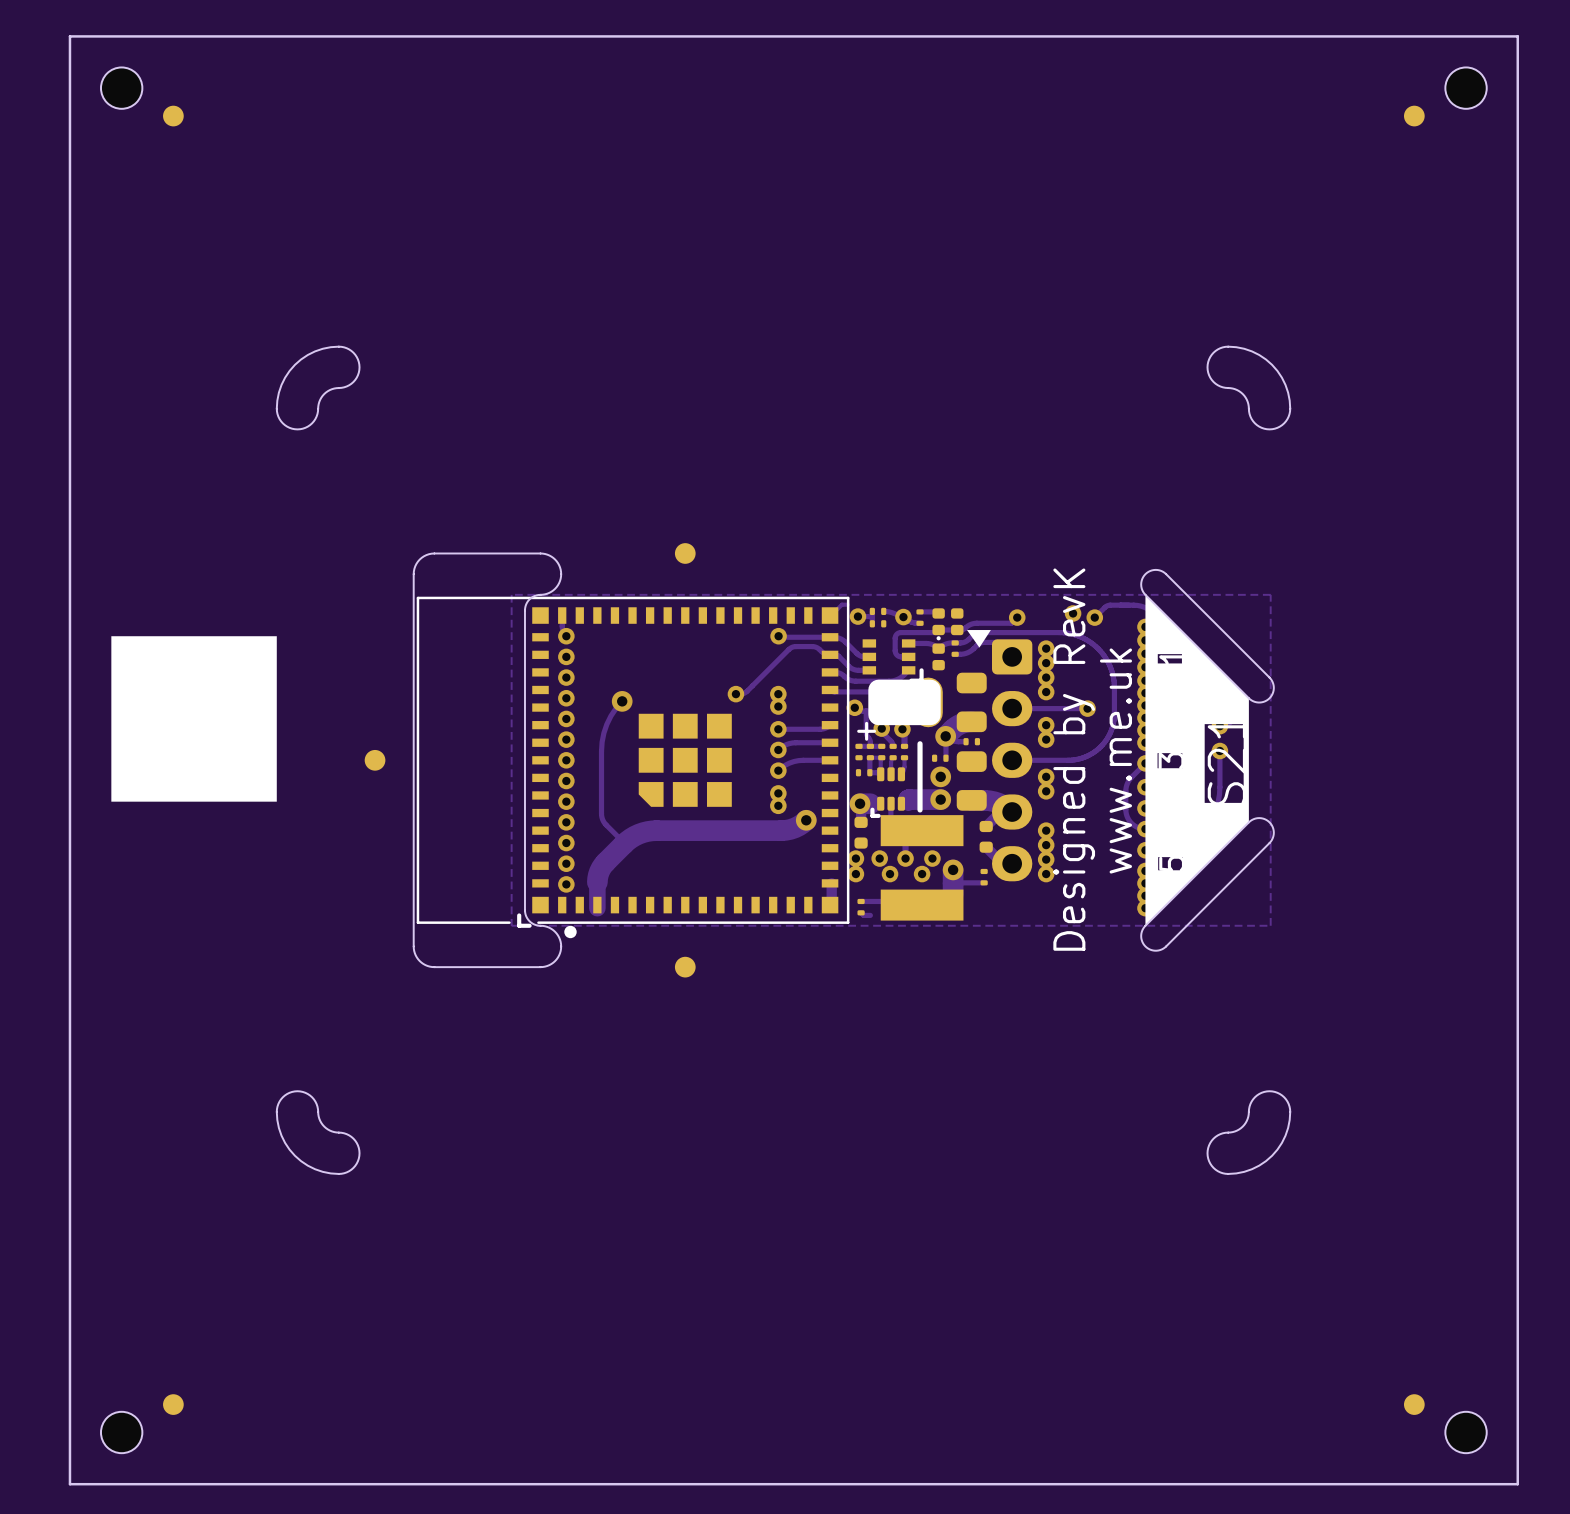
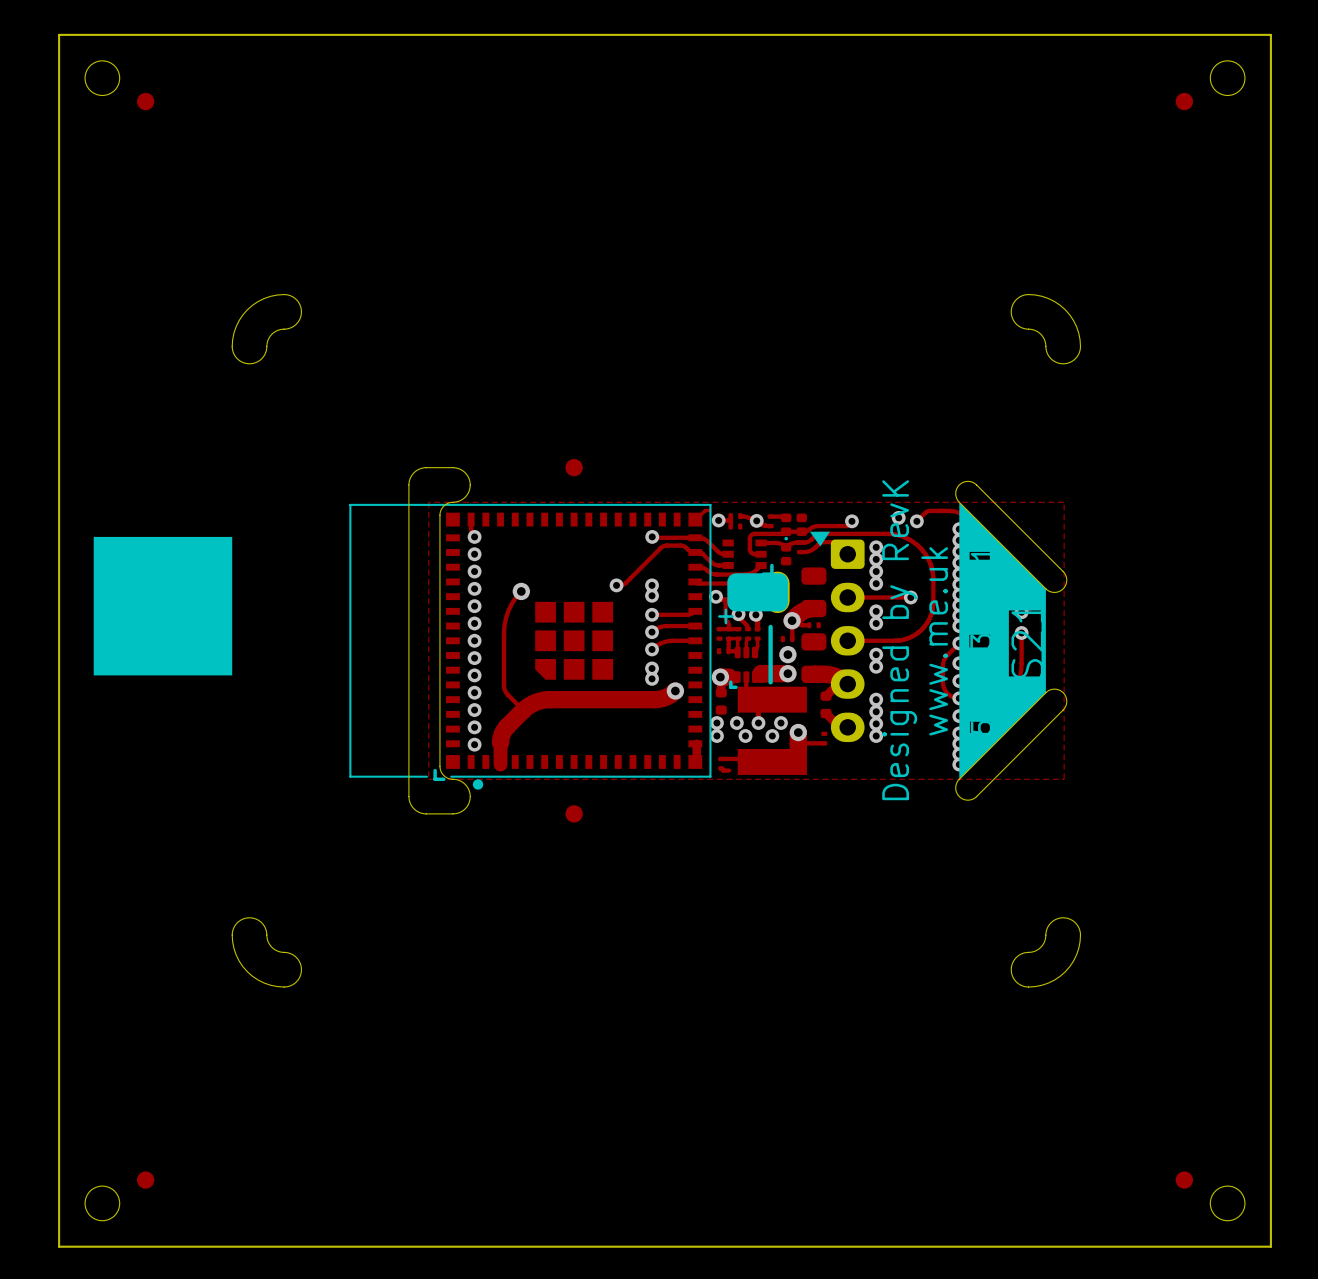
board edge: (508, 553) (429, 554) (417, 561) (413, 574) (414, 951) (419, 961) (429, 966) (508, 967) -> (426, 467) (413, 472) (408, 484) (408, 796) (413, 808) (426, 813)
part: (375, 760) -> none

